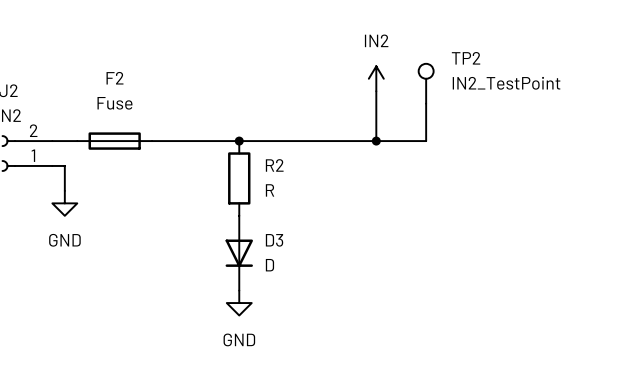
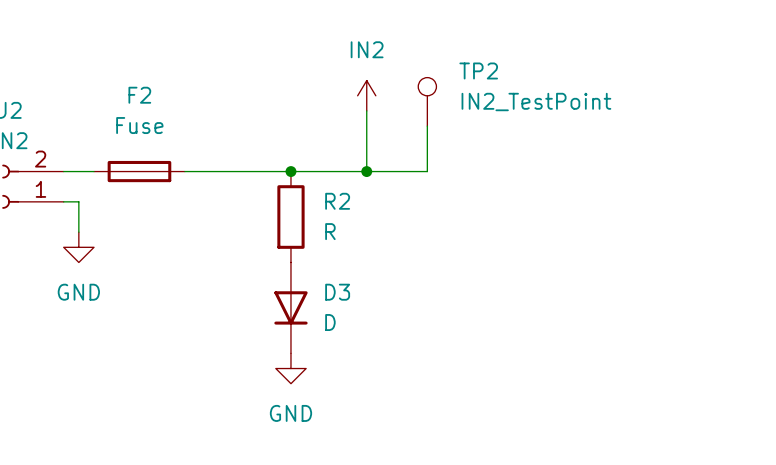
power symbol position: IN2 (376, 78) -> IN2 (366, 95)
TP2 position: (426, 83) -> (427, 101)
wire: (376, 91) (376, 141) -> (366, 110) (366, 171)
wire: (426, 103) (426, 141) (351, 141) -> (427, 126) (427, 171)
junction: none -> (366, 171)
junction: (376, 141) -> none

